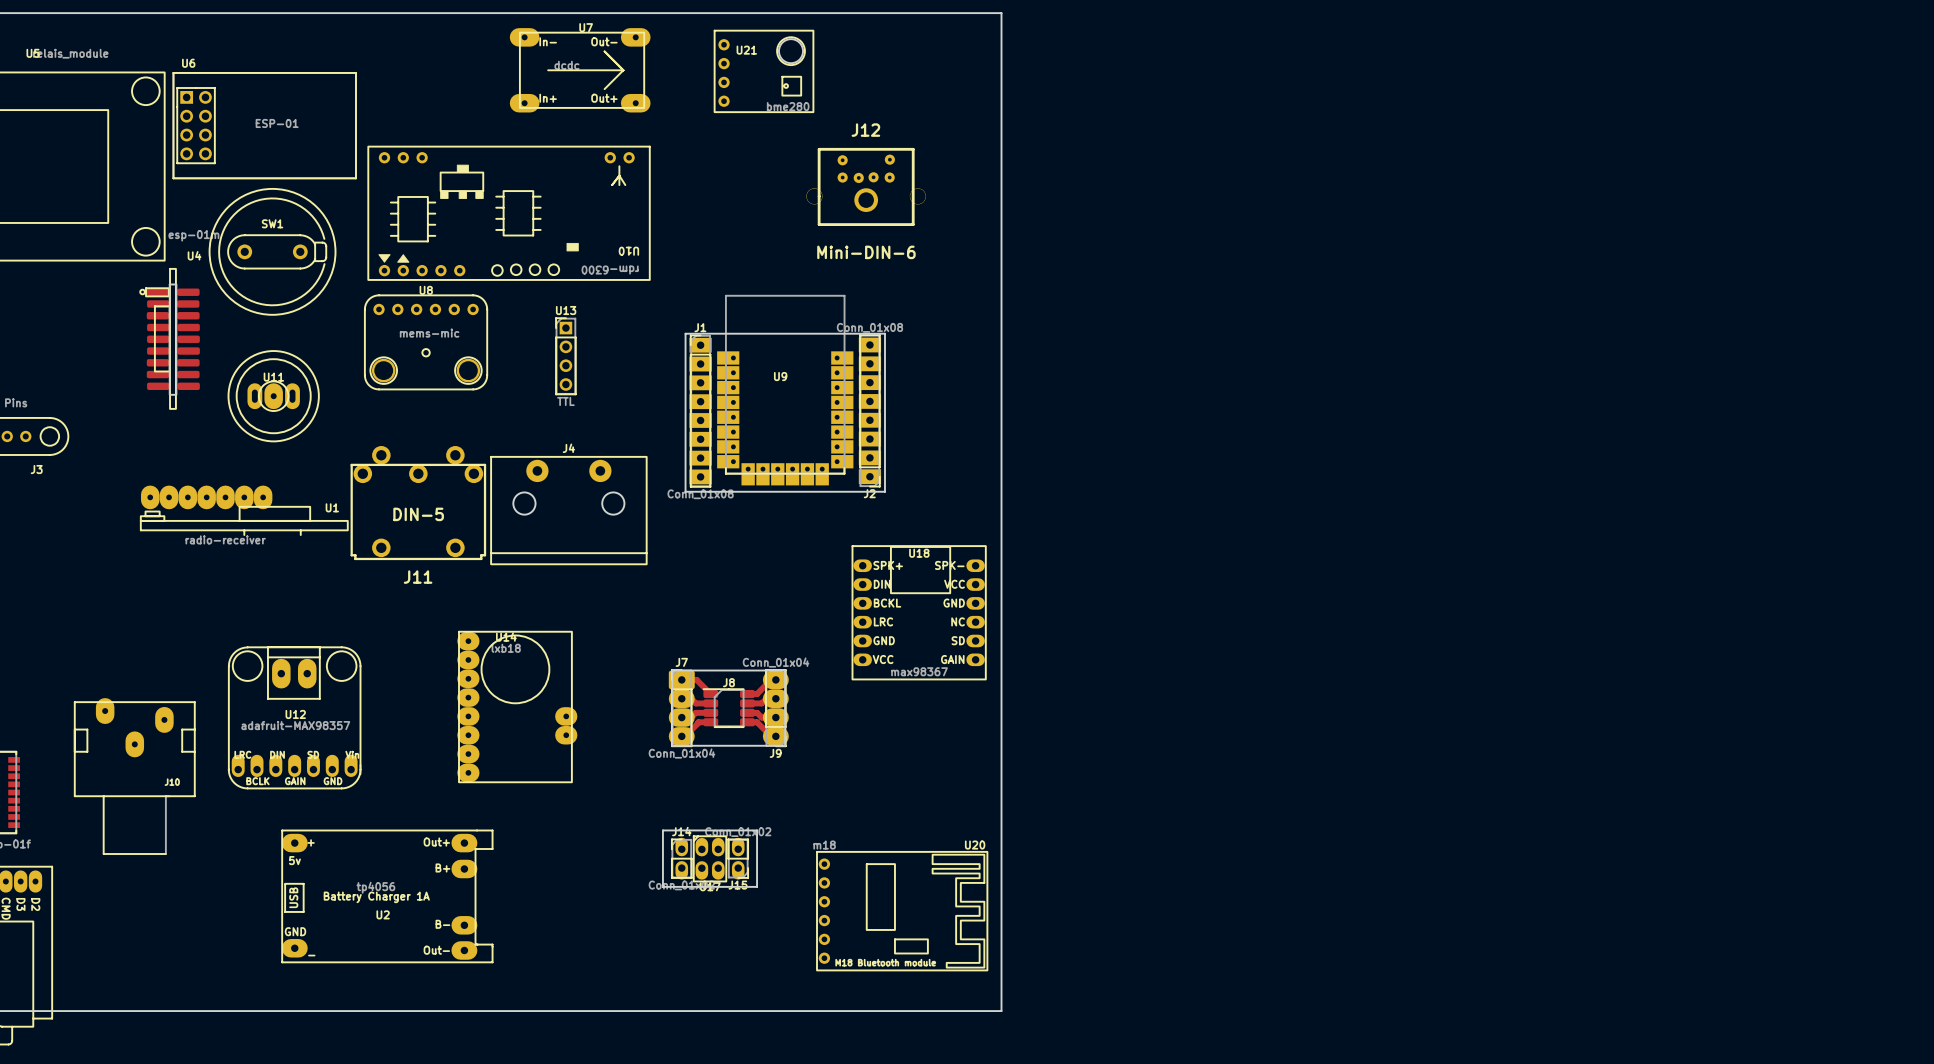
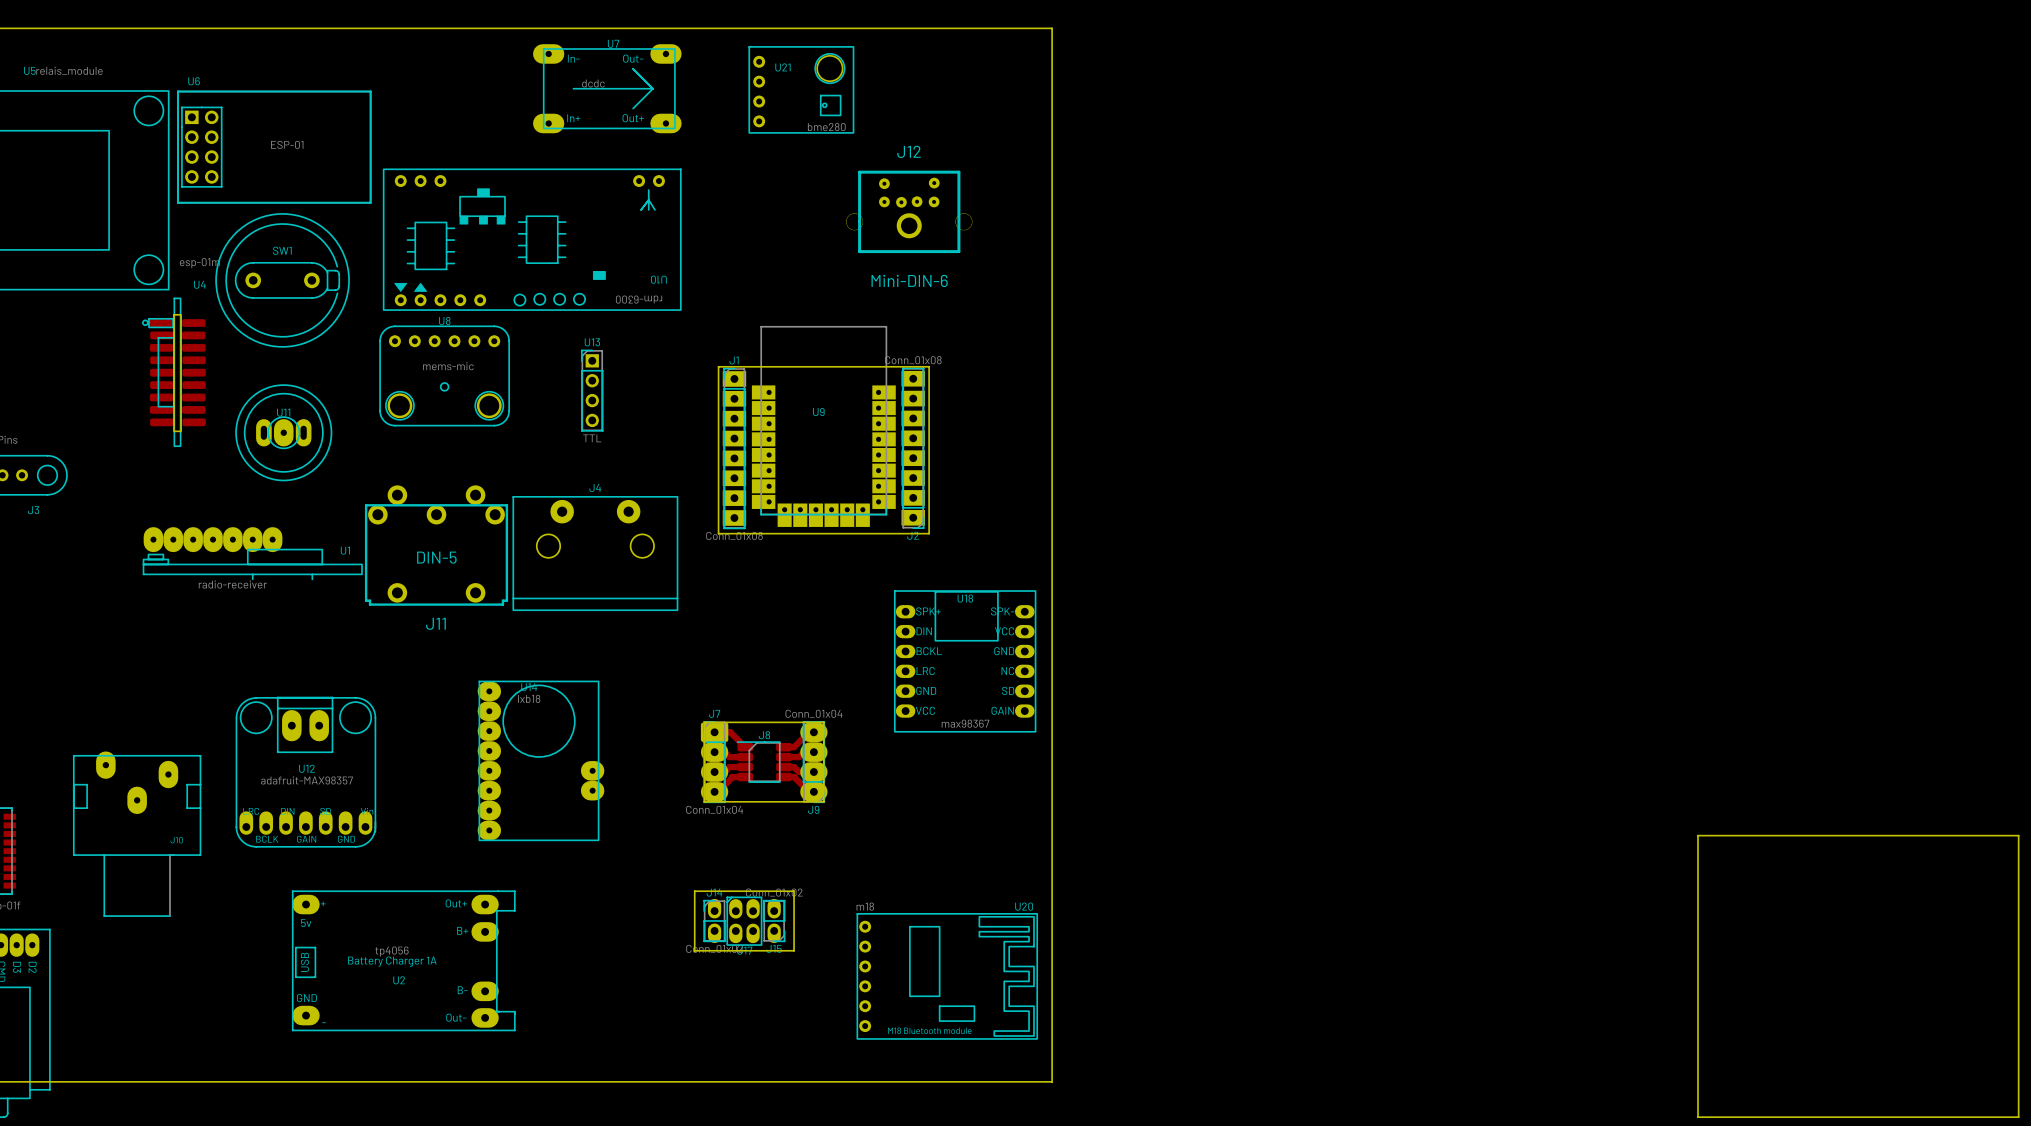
board edge: none -> (1698, 835) (2018, 835) (2018, 1117) (1698, 1117) (1698, 835)

